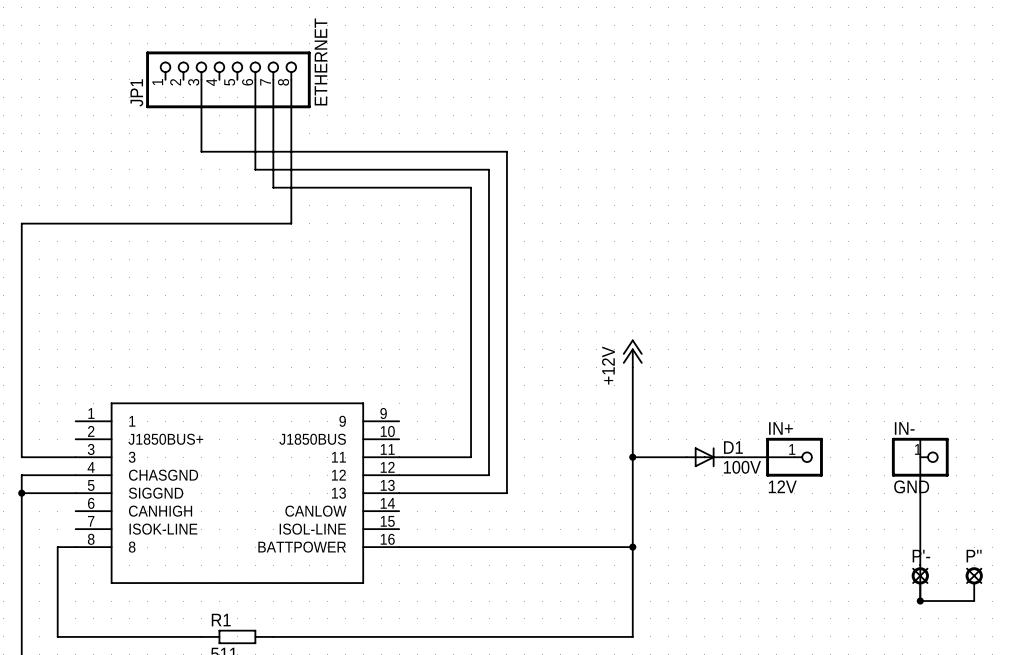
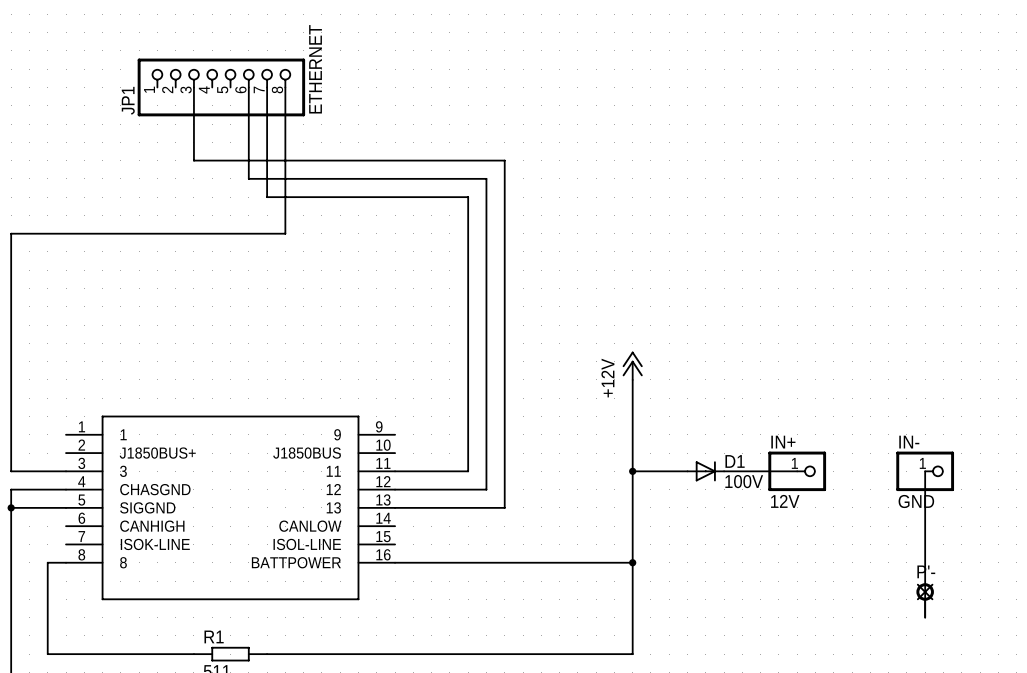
wire: (920, 439) (920, 457) -> none
P'': (974, 584) -> none
wire: (920, 601) (974, 601) -> none
junction: (920, 601) -> none

